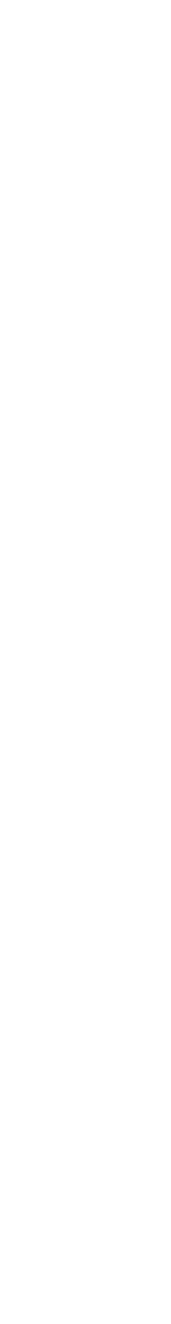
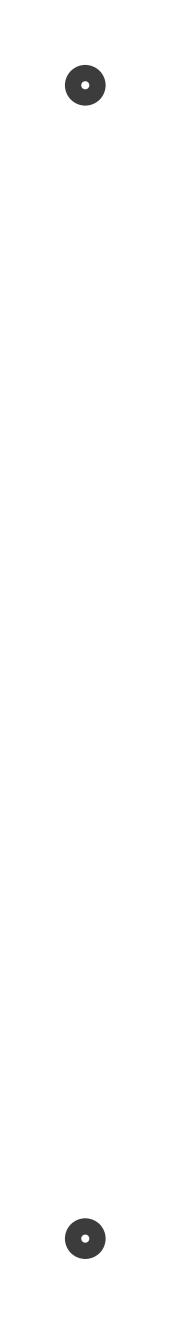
part: none -> (85, 85)
part: none -> (85, 1238)

